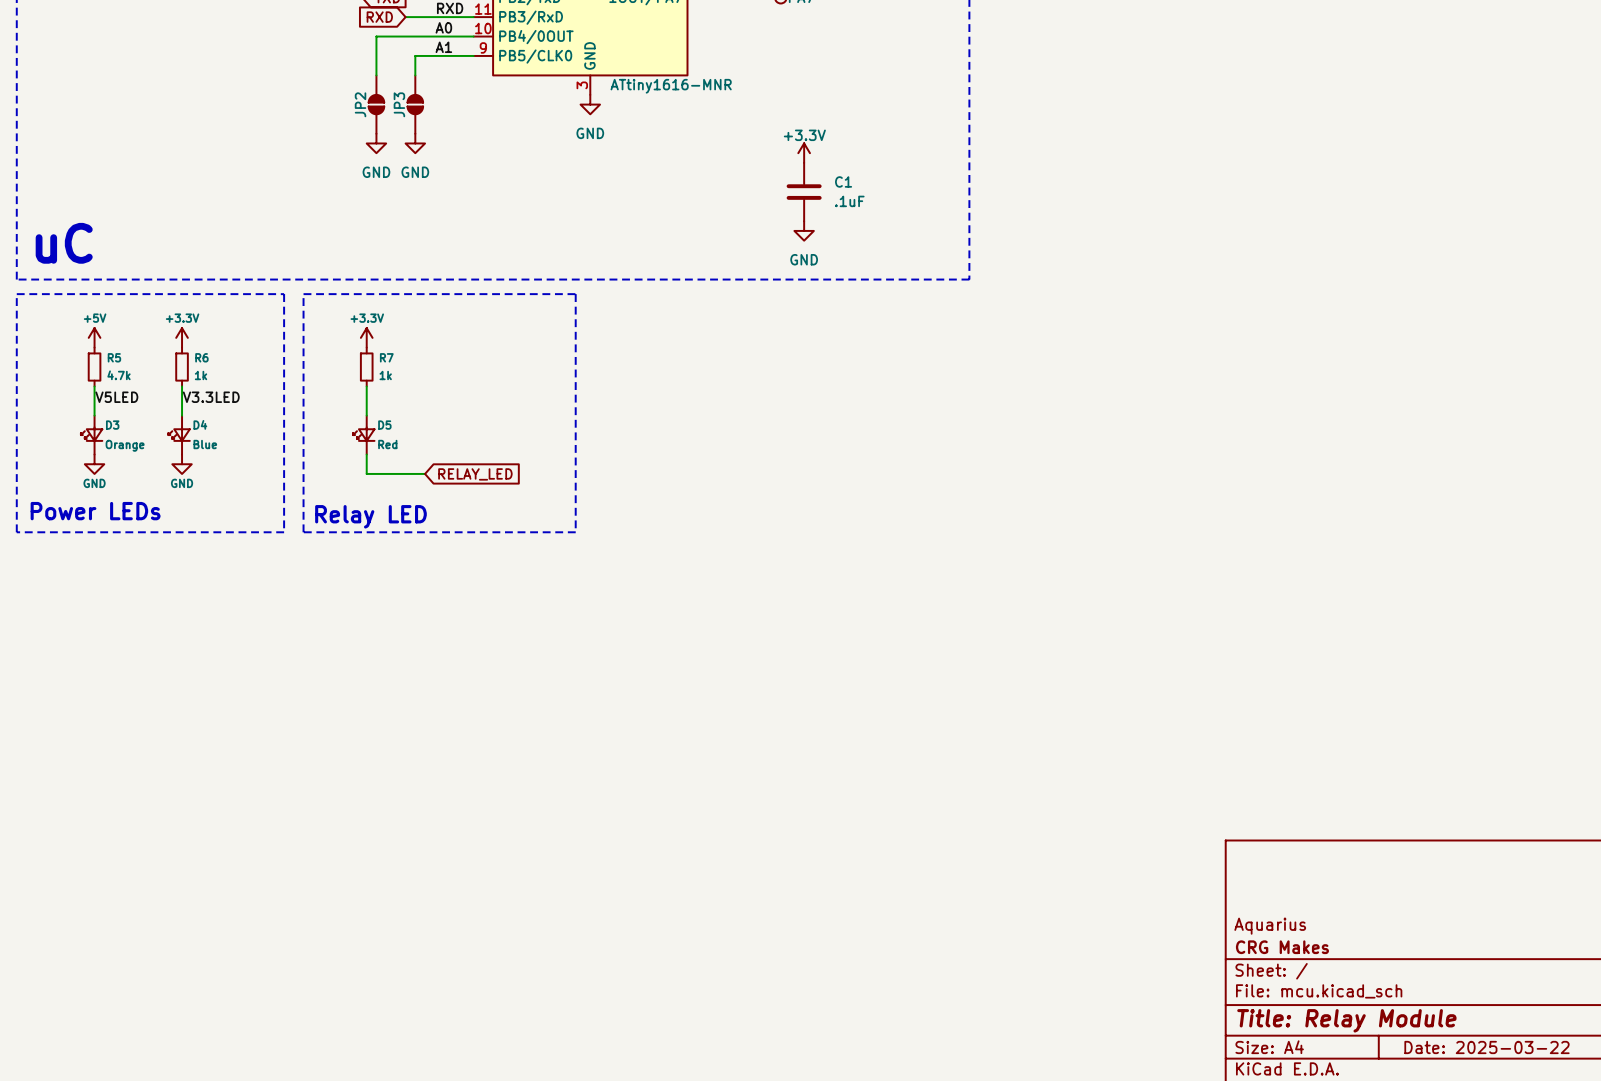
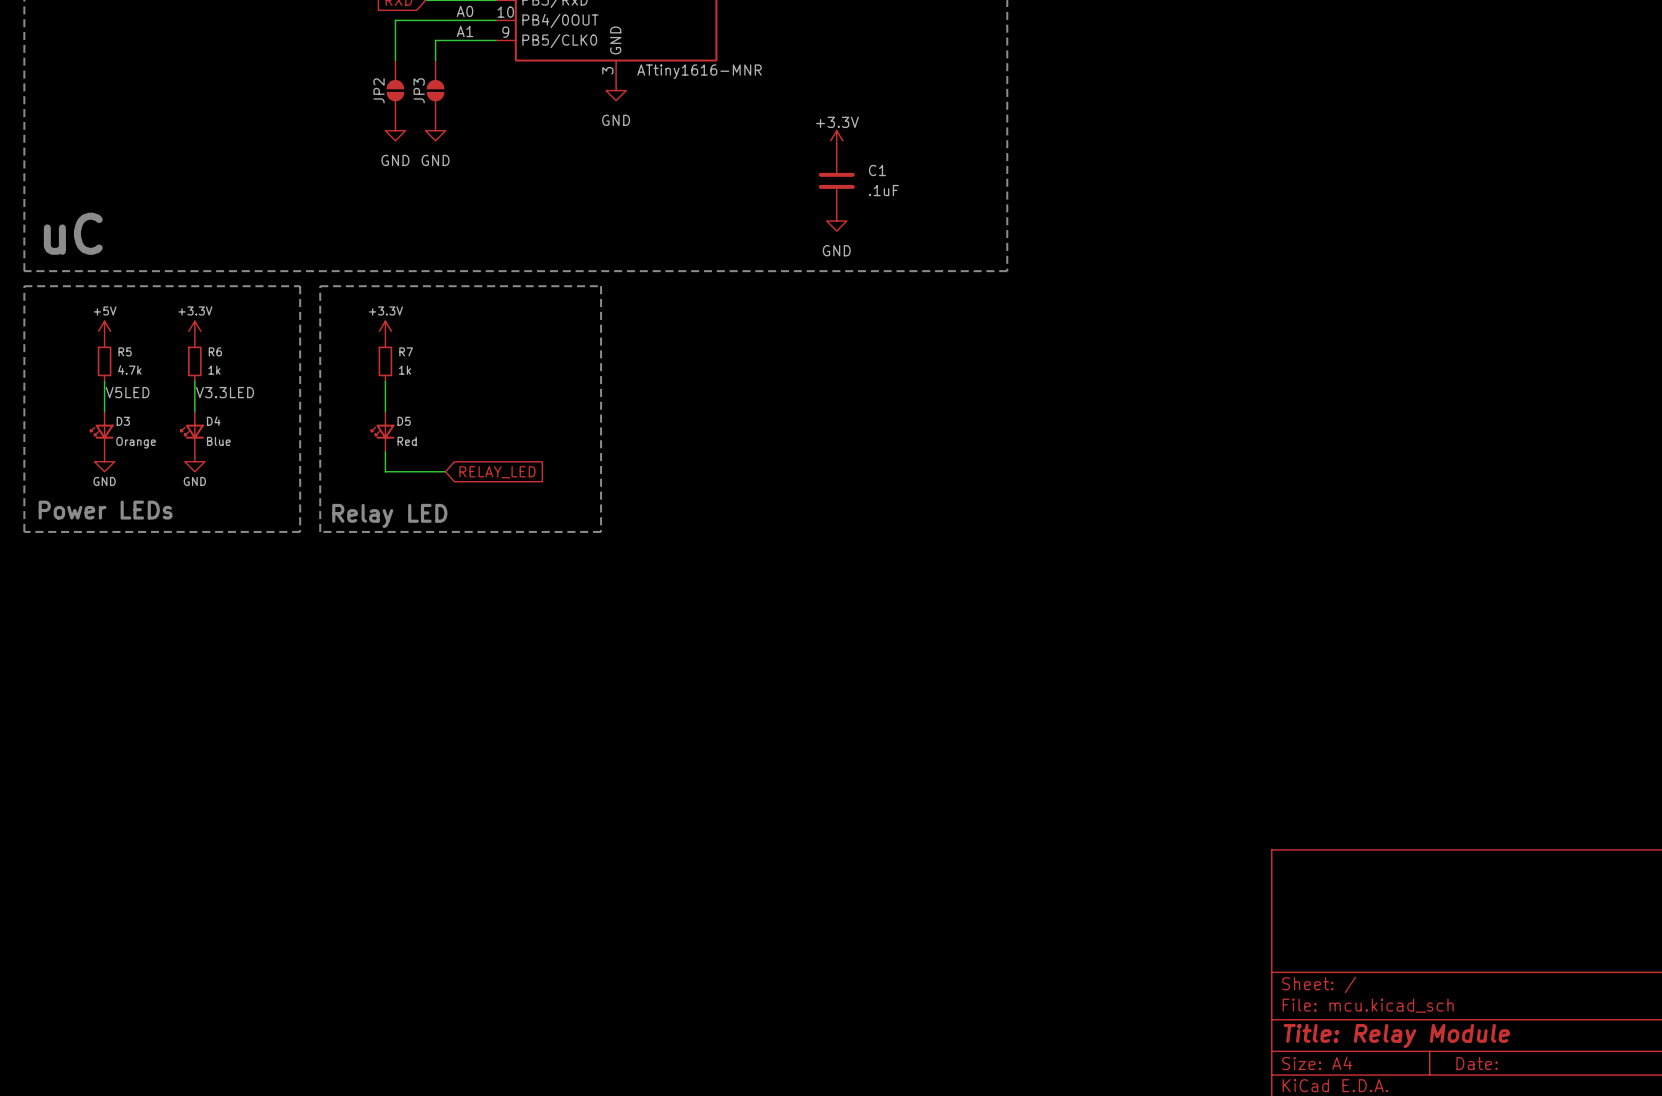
title block: Aquarius (1270, 926) -> none
title block: CRG Makes (1282, 947) -> none
title block: Date: 2025-03-22 (1486, 1047) -> Date: (1477, 1063)

